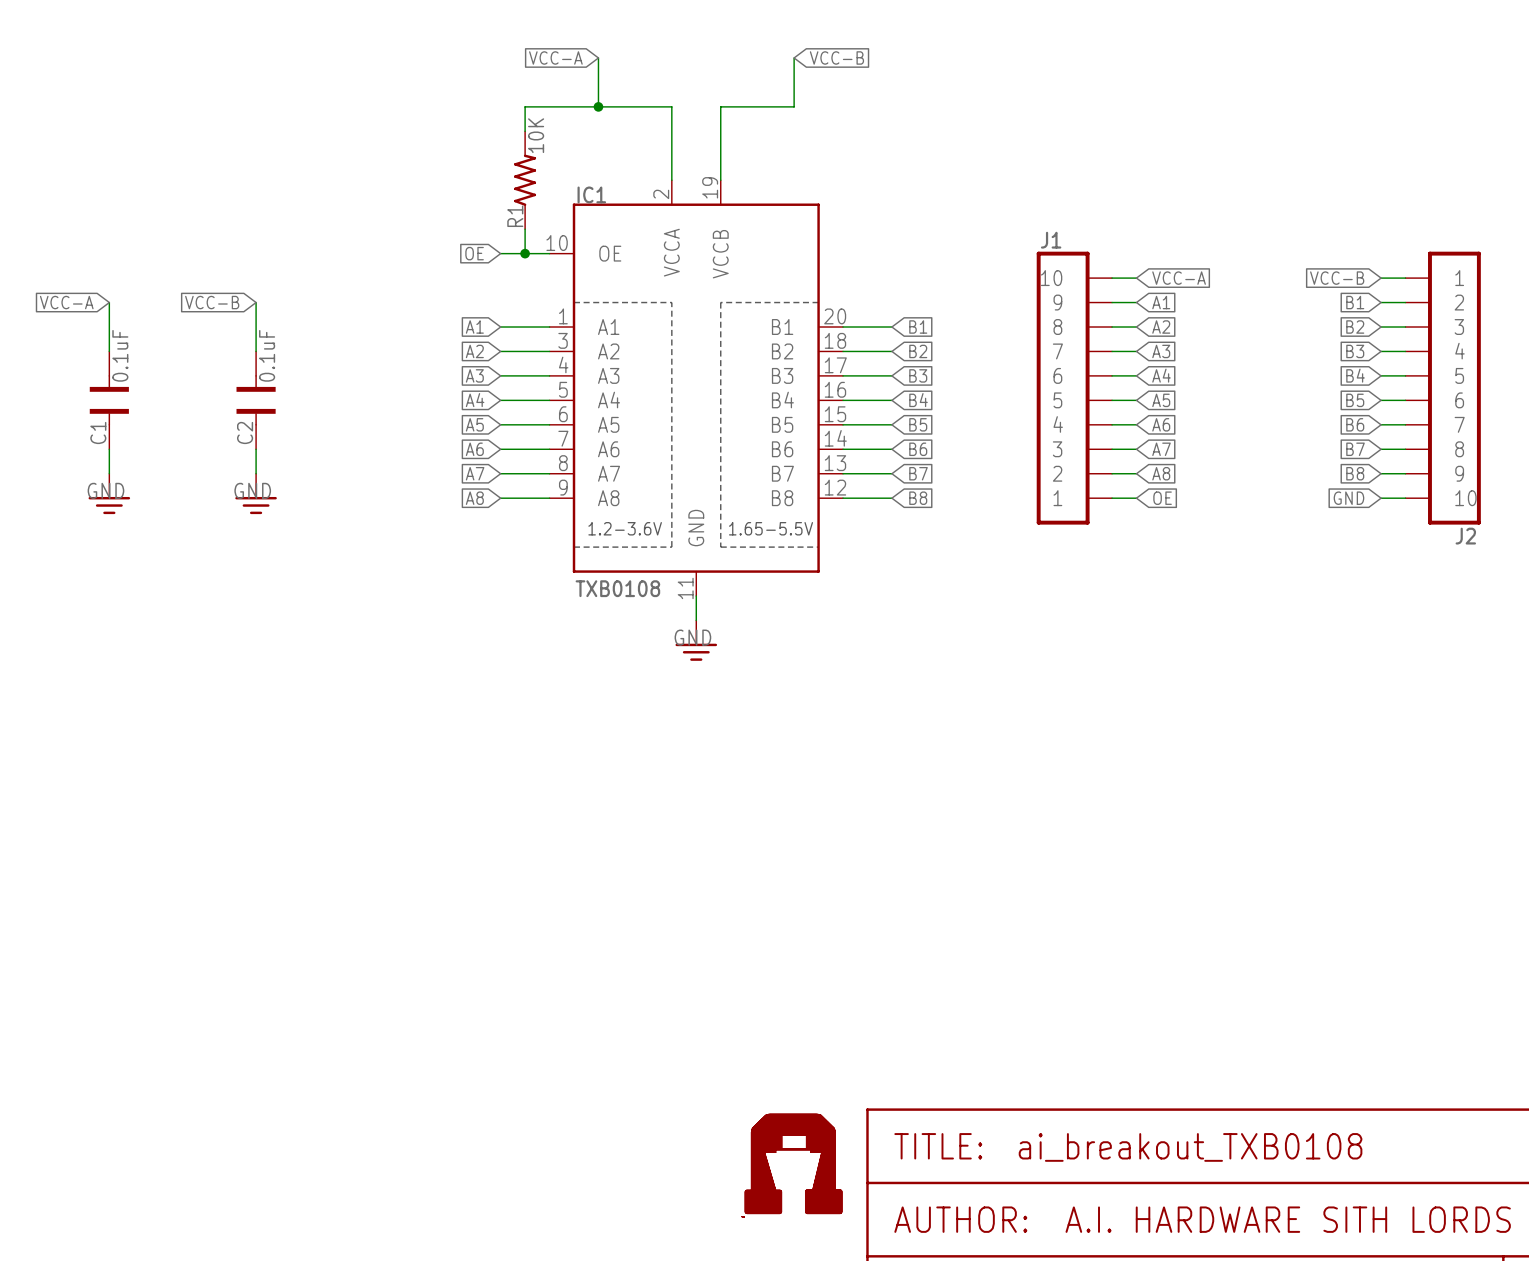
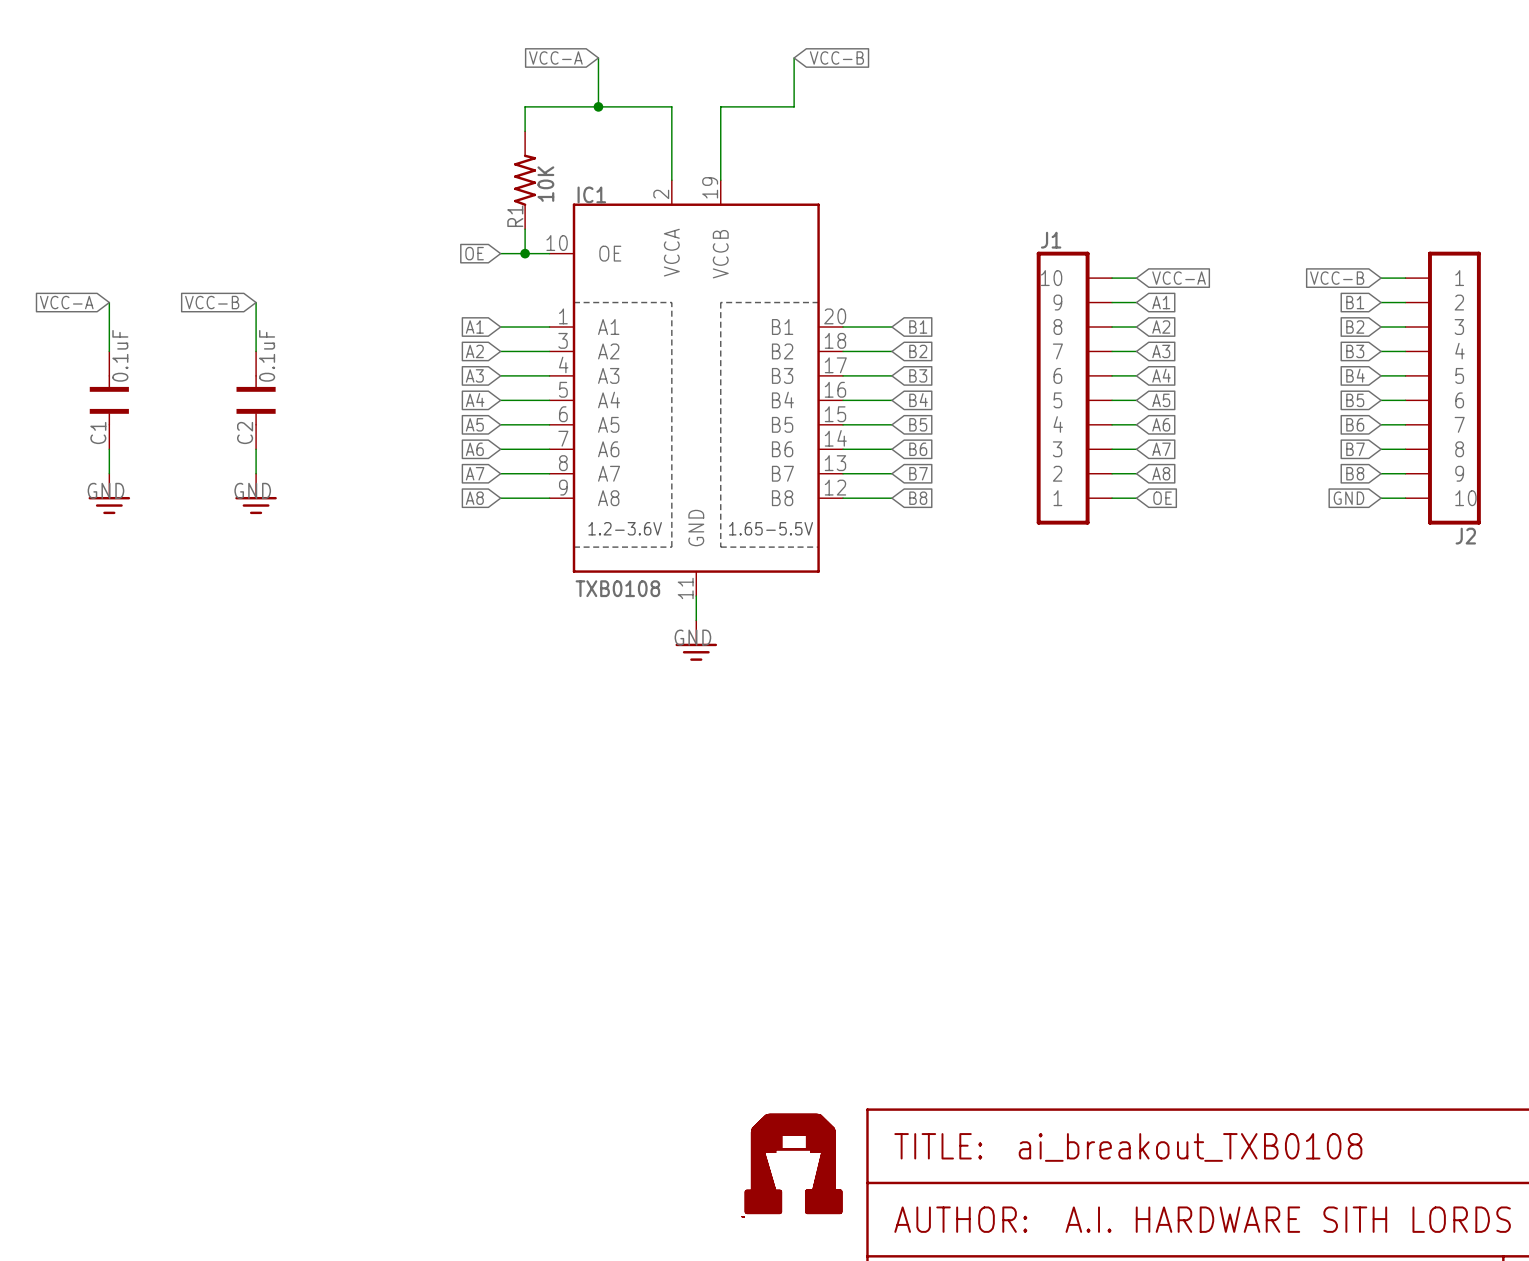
R1 value position: 10K (536, 135) -> 10K (545, 184)

